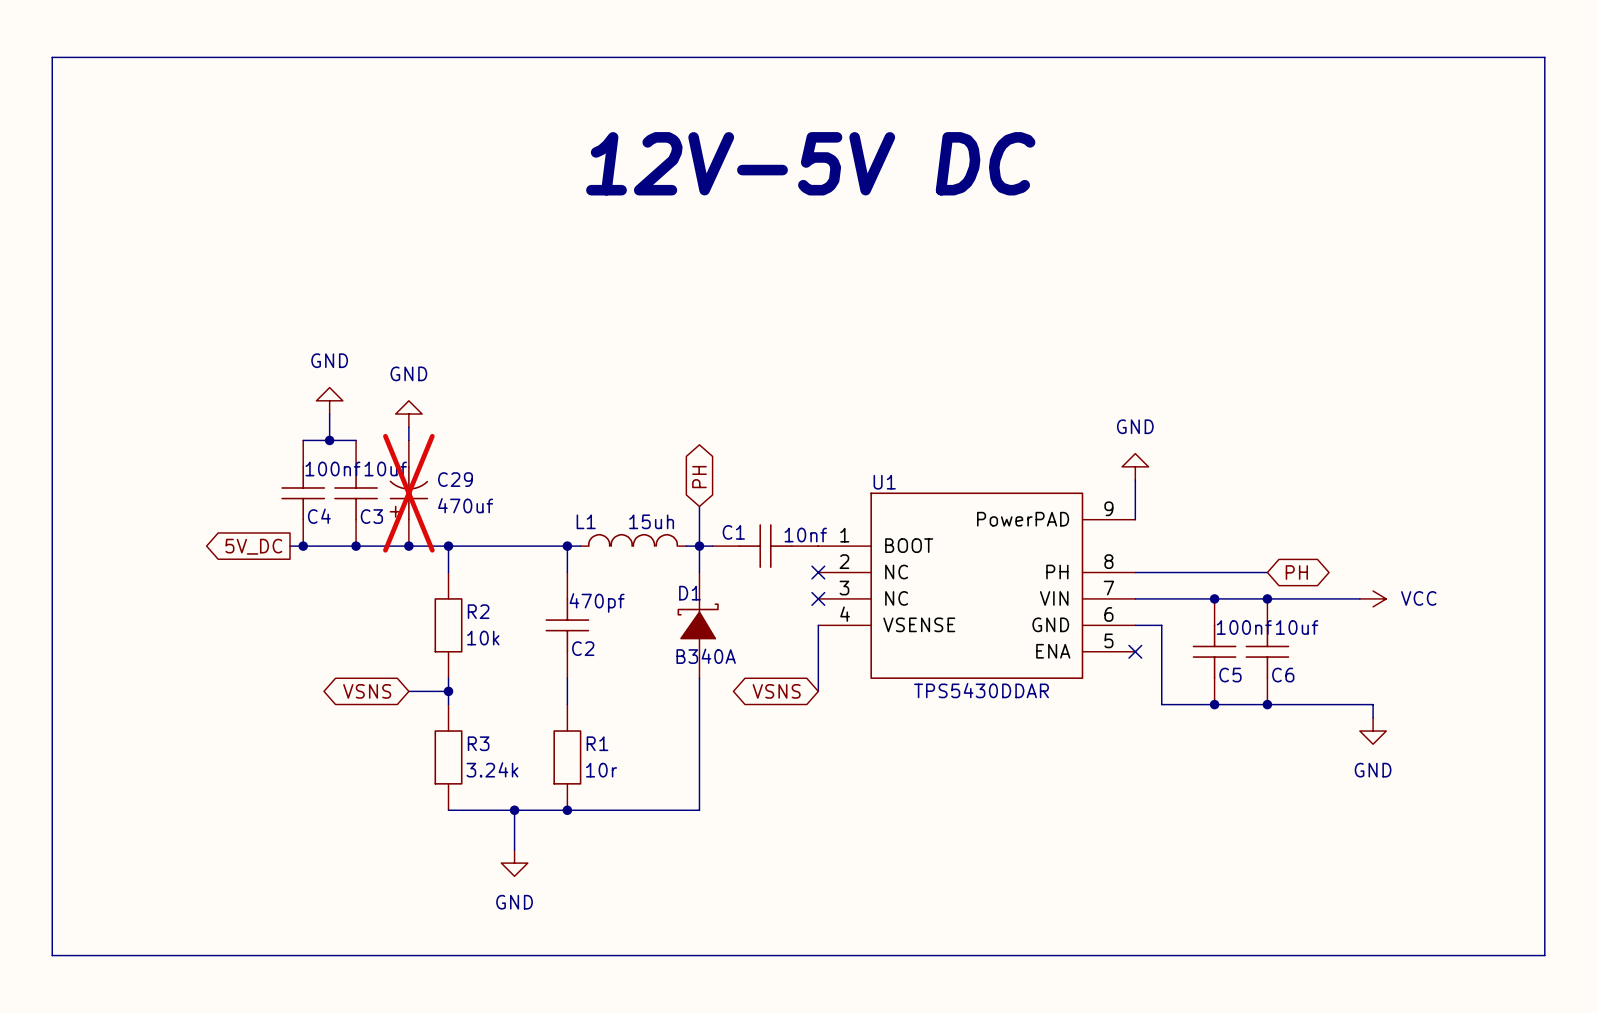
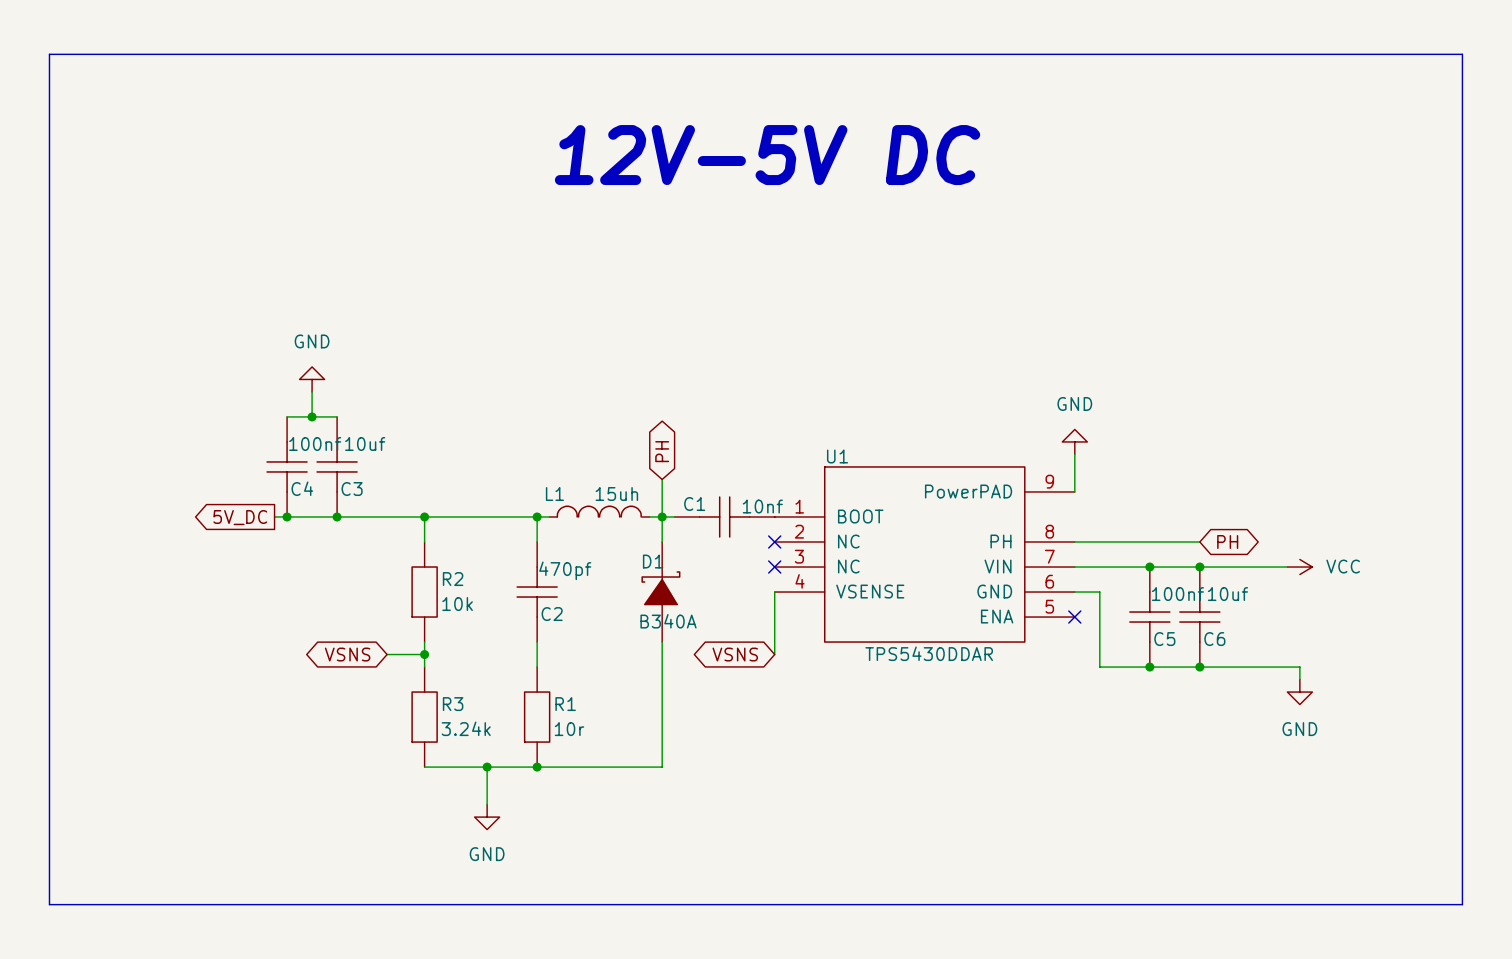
power symbol: GND (408, 414) -> none
wire: (408, 427) (408, 440) -> none
C29: 470uf (408, 493) -> none
junction: (408, 546) -> none

